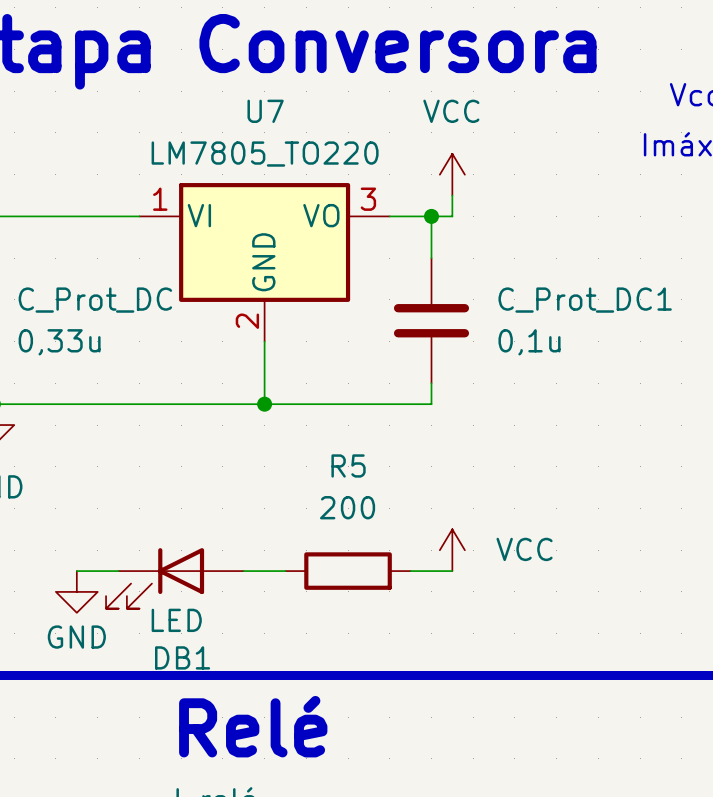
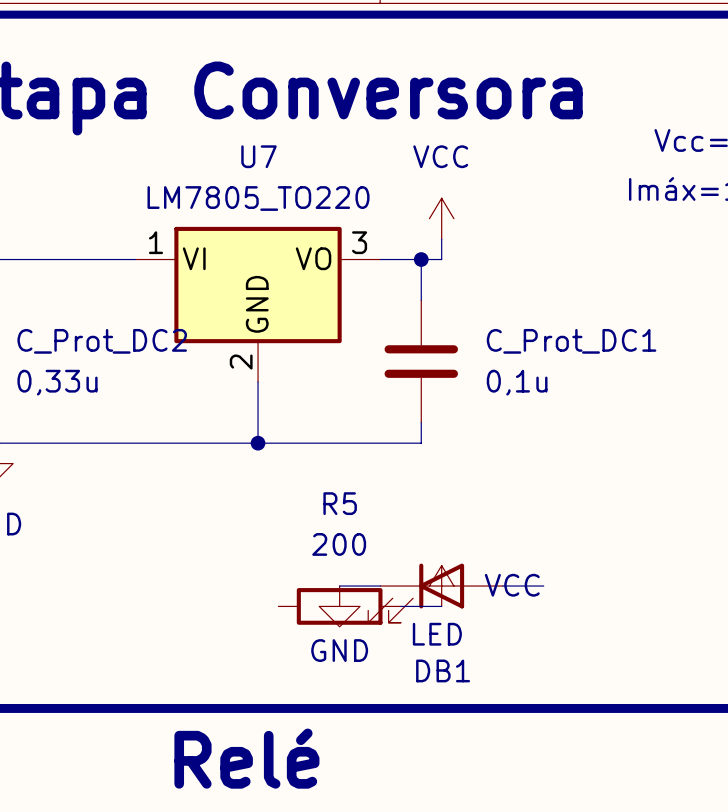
C_Prot_DC name: C_Prot_DC (95, 300) -> C_Prot_DC2 (102, 341)
wire: (76, 571) (118, 571) -> (339, 586) (380, 586)
wire: (243, 571) (285, 571) -> (502, 586) (543, 586)
DB1 position: (174, 578) -> (435, 593)
power symbol position: GND (76, 591) -> GND (339, 606)

